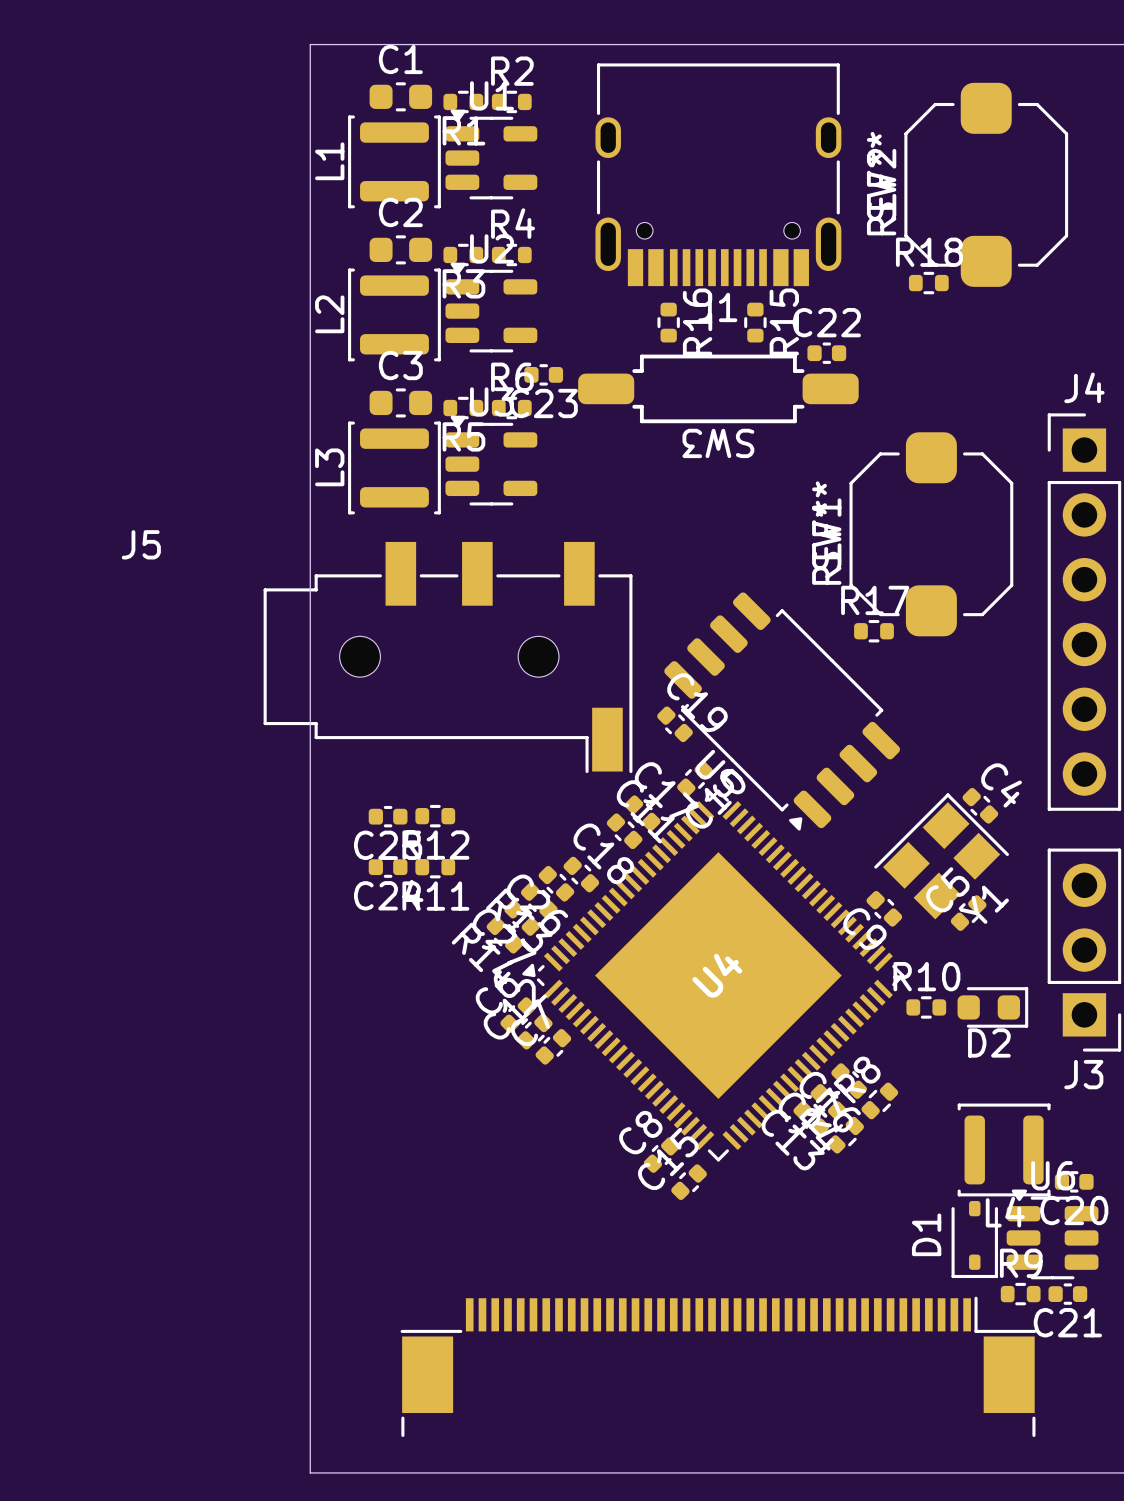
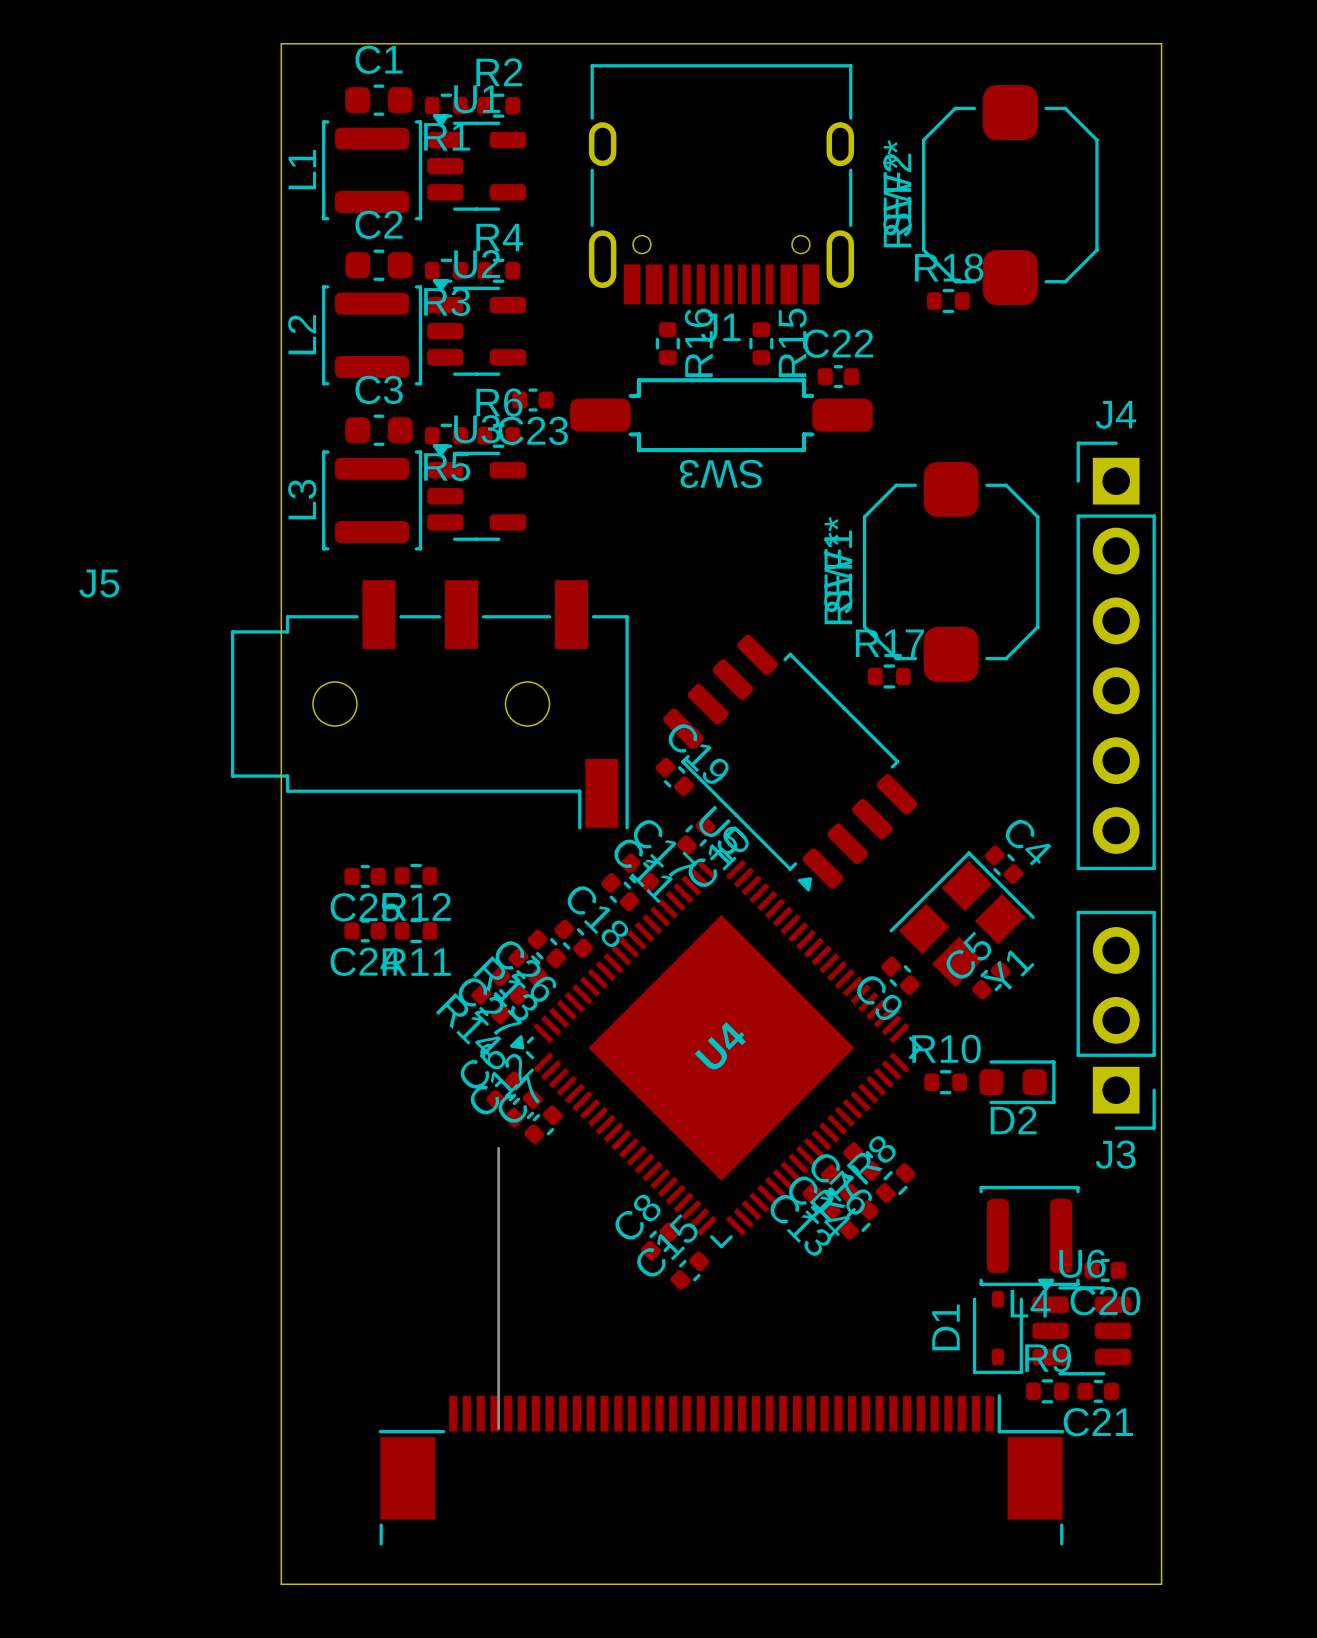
line: none -> (498, 1148) (498, 1428)

